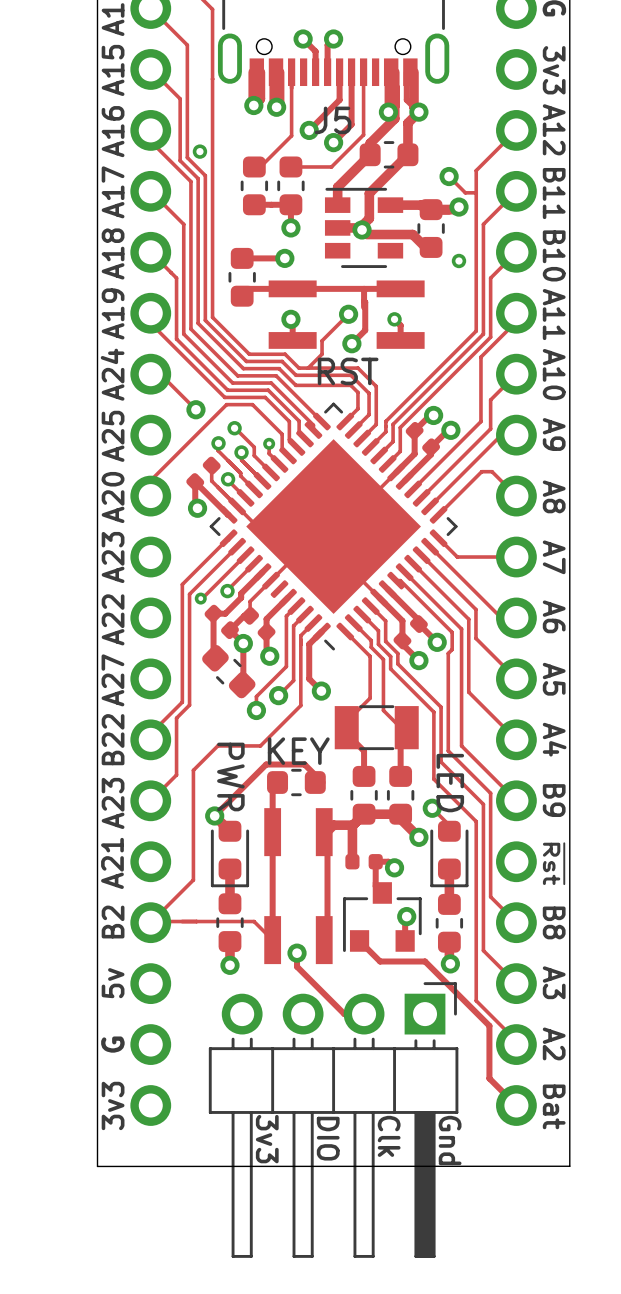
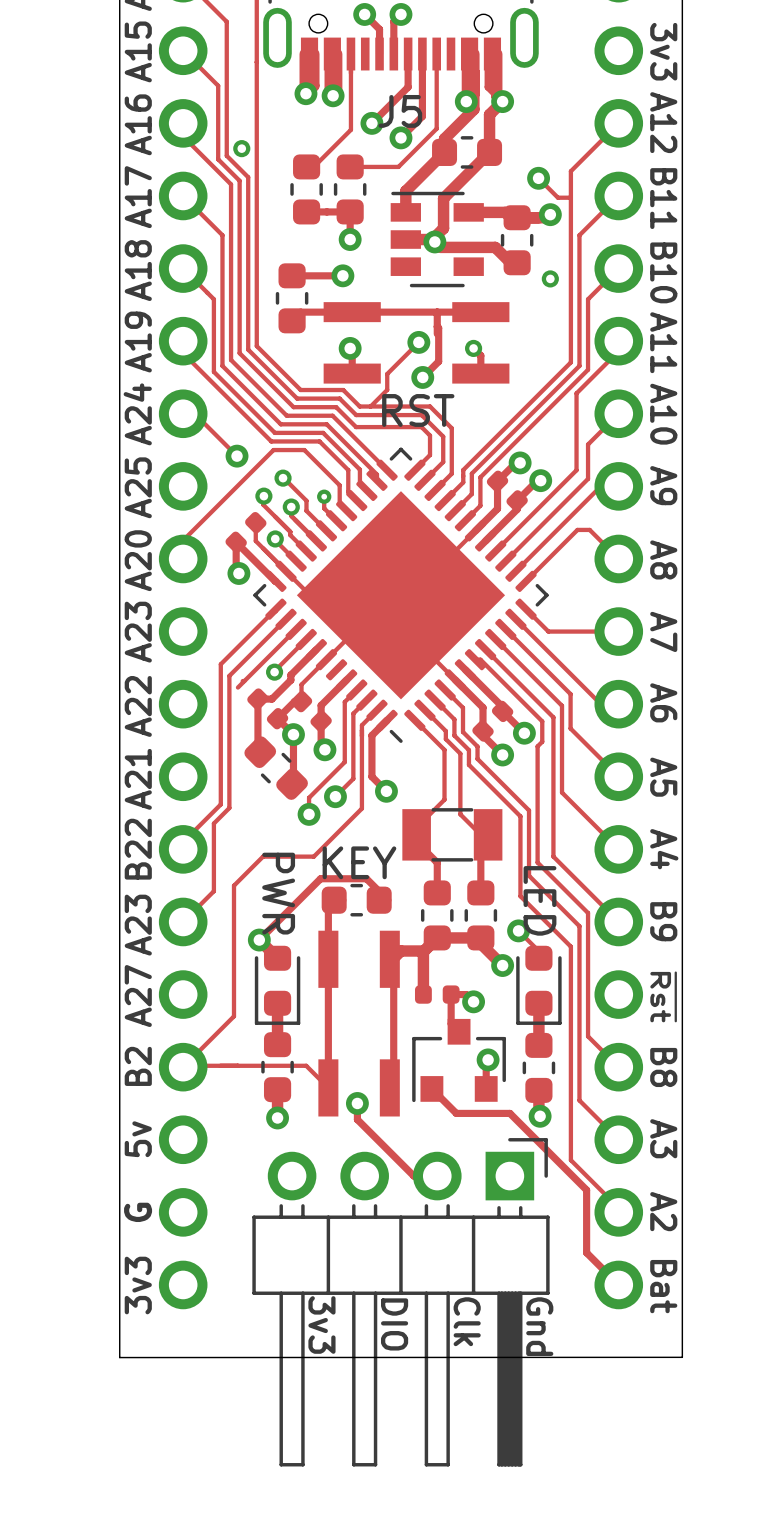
via: (200, 598) -> none
text: A27 (112, 680) -> A21 (138, 779)
text: A21 (112, 863) -> A27 (138, 996)

